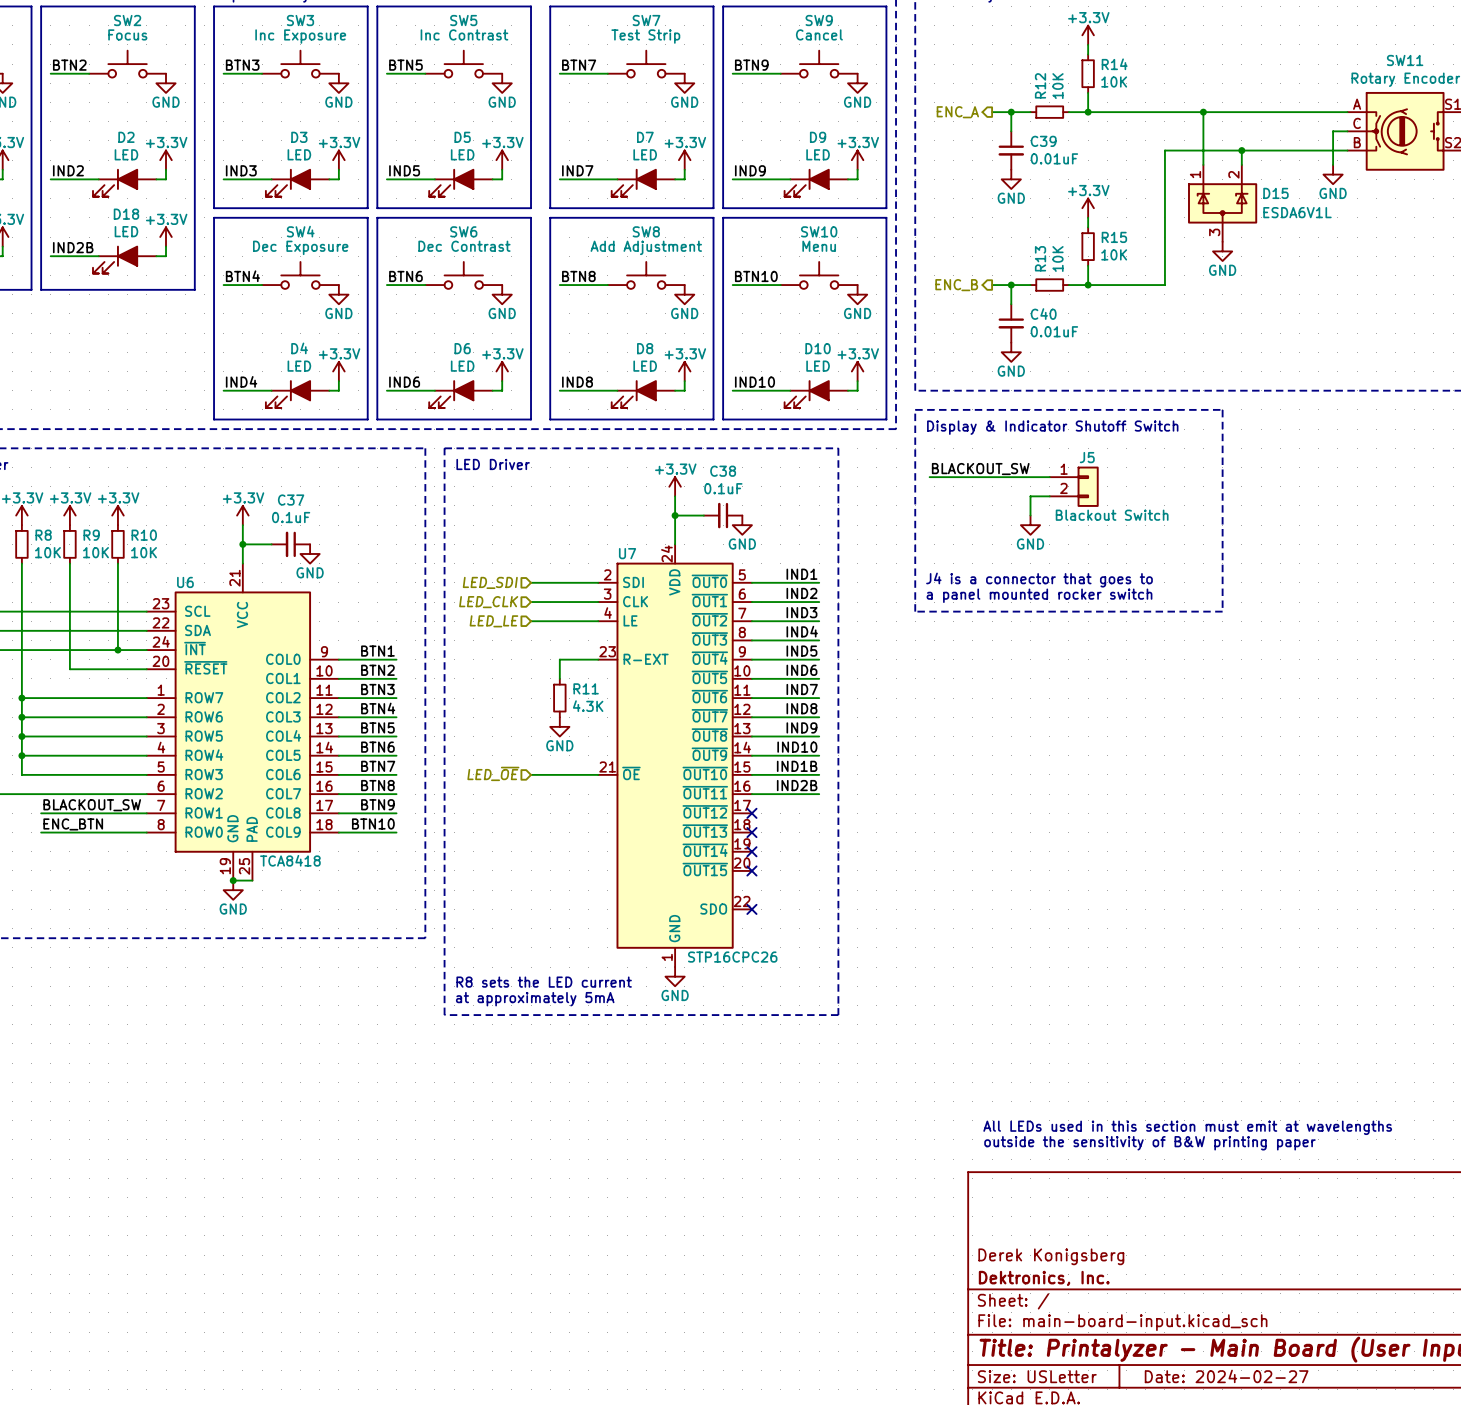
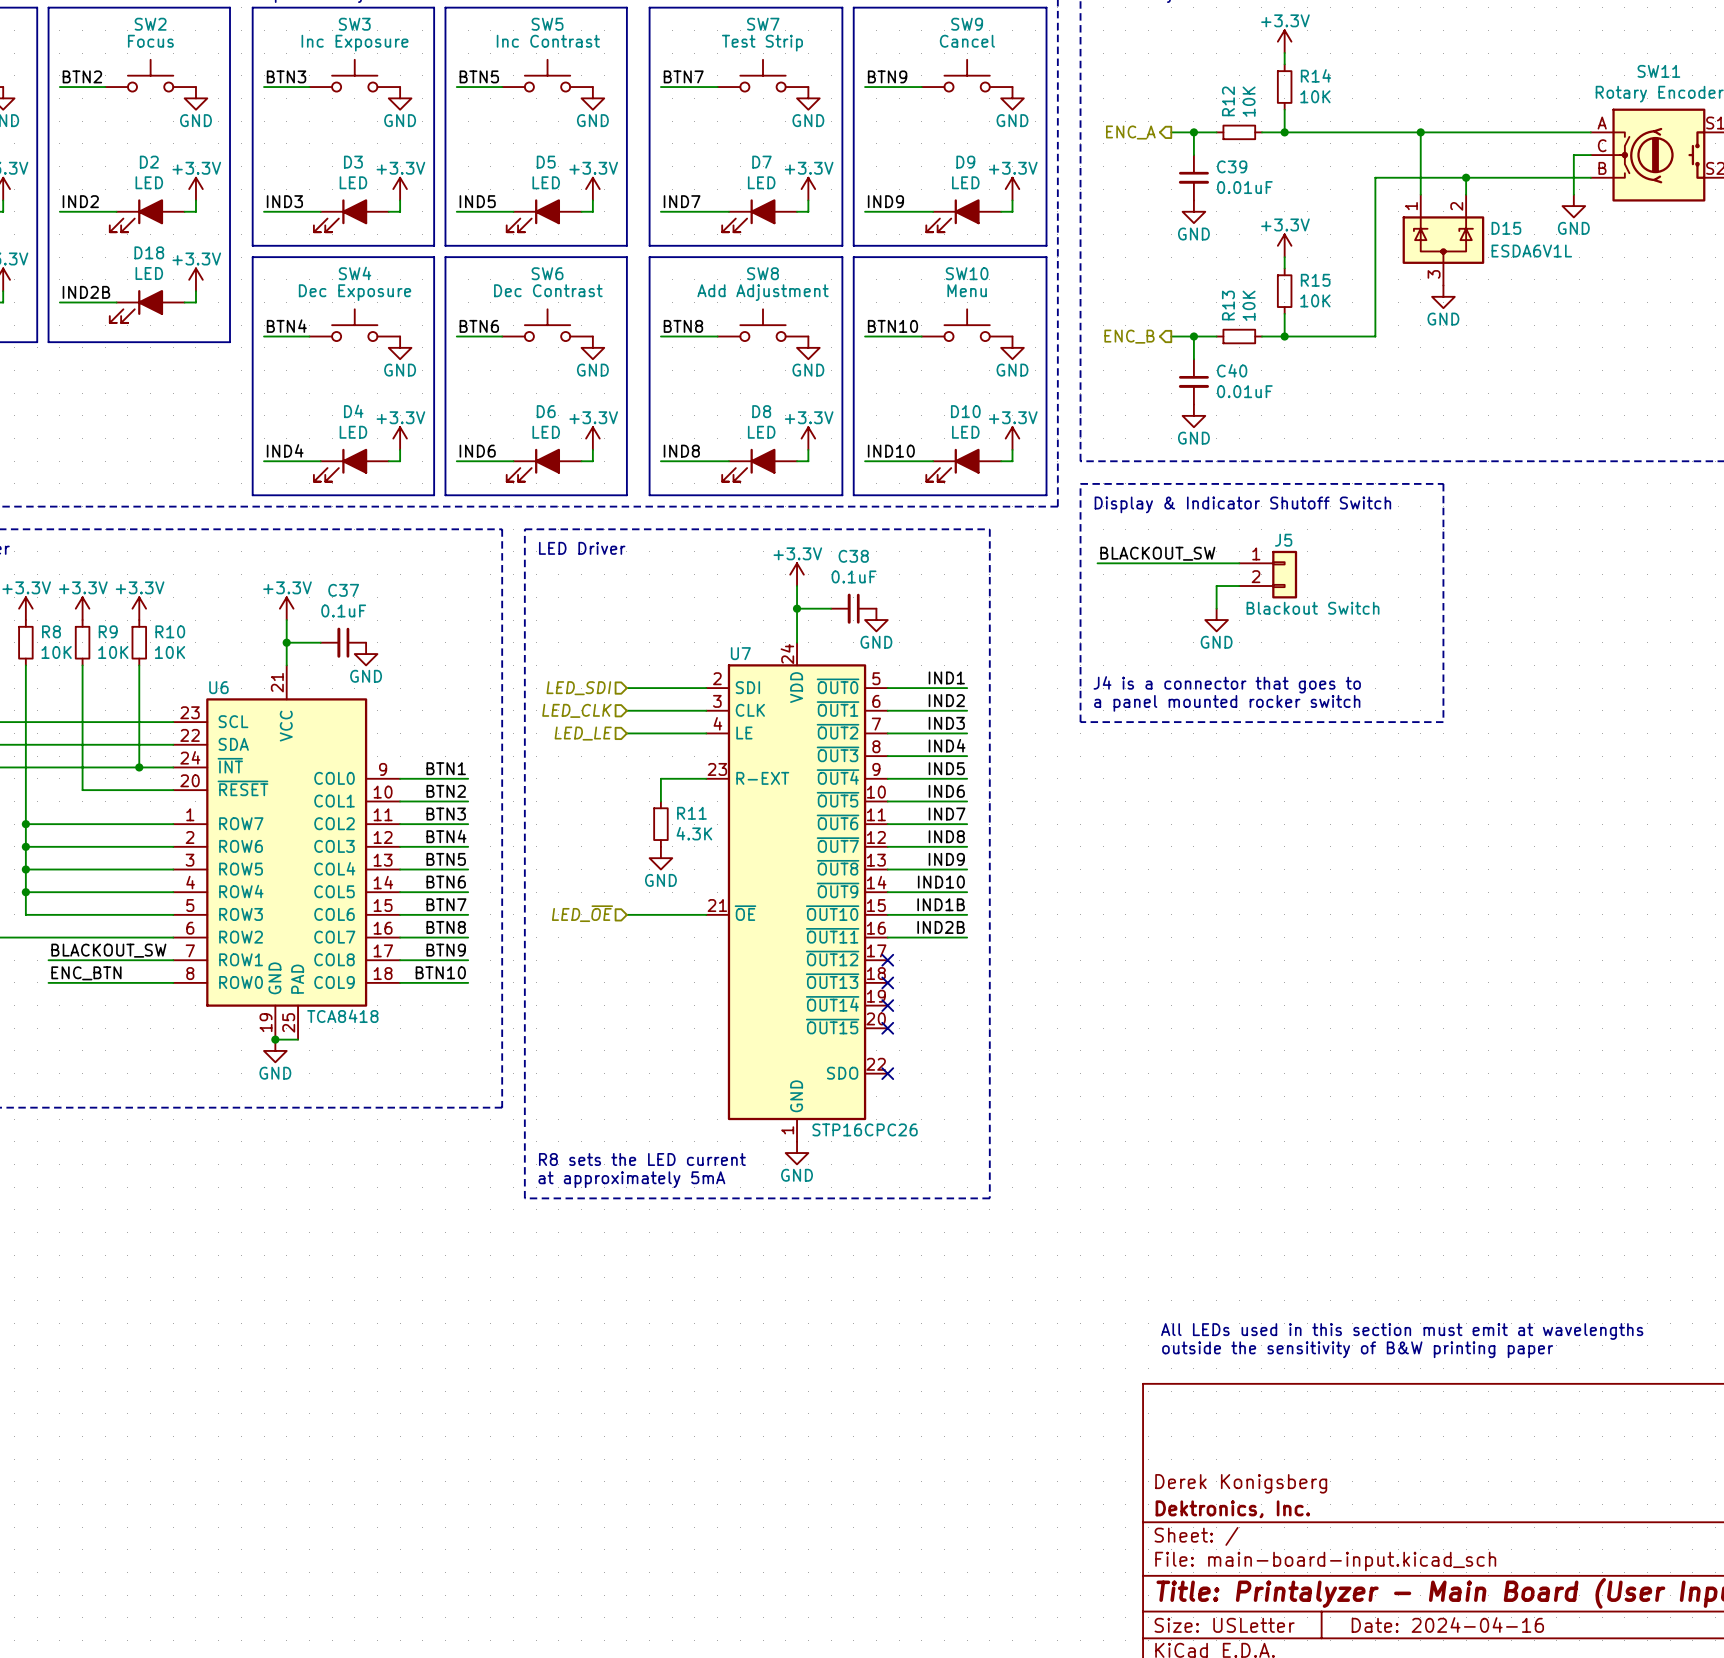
title block: Date: 2024-02-27 (1226, 1376) -> Date: 2024-04-16 (1447, 1625)

